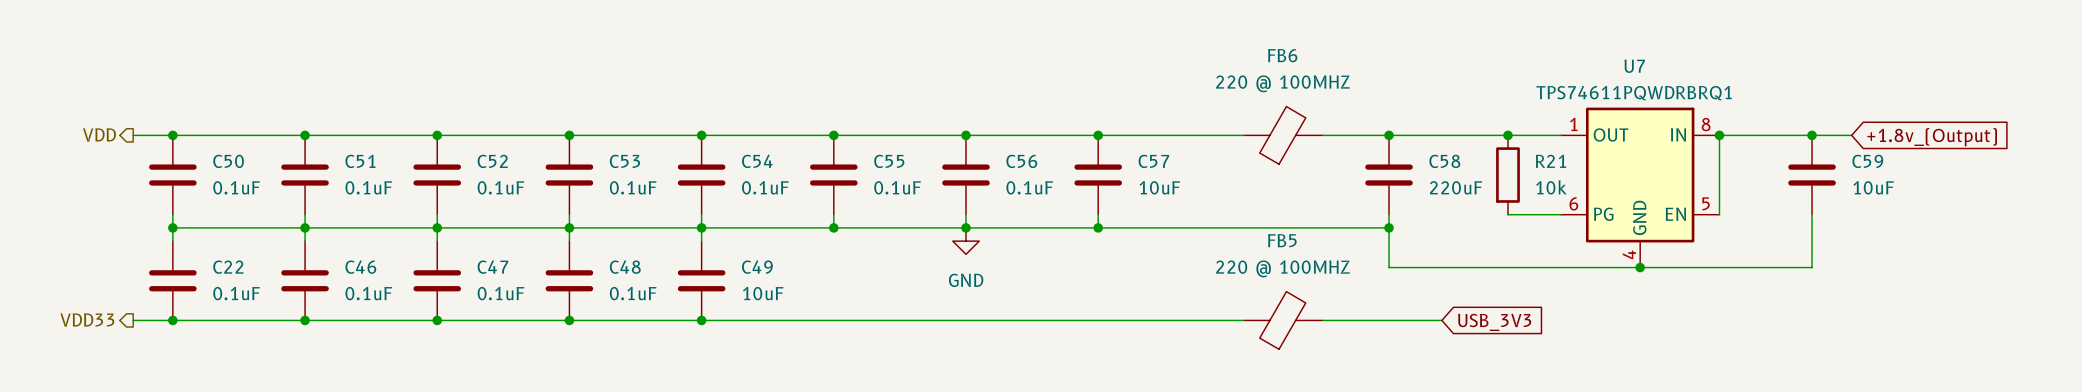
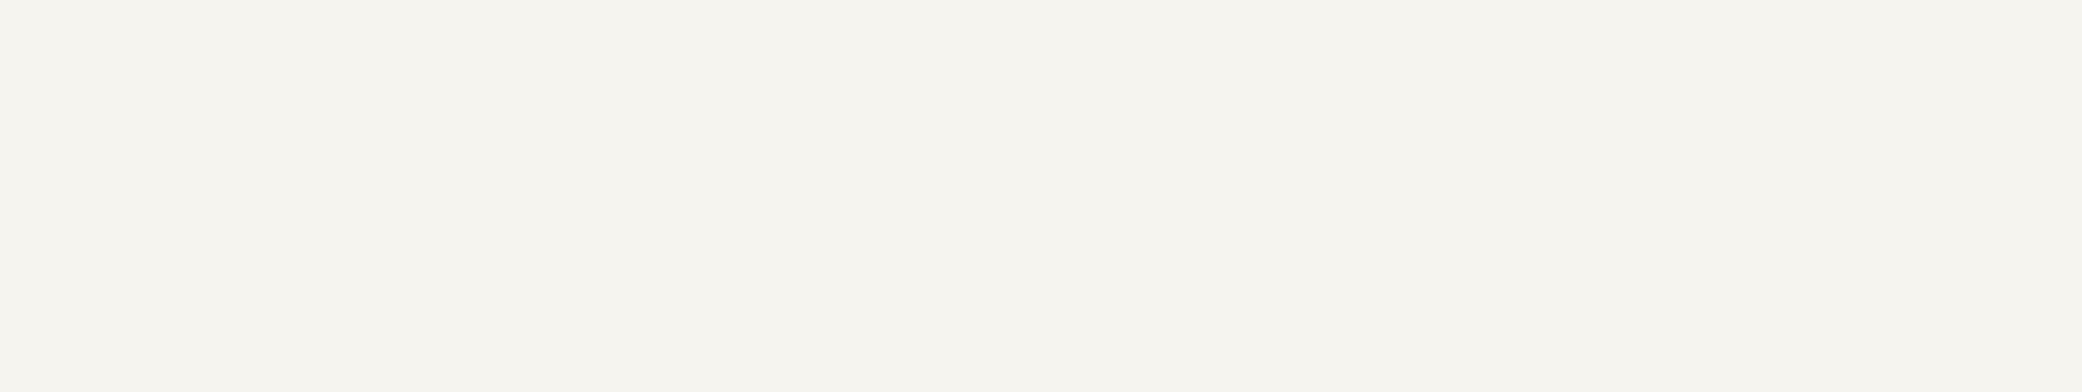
hierarchical label: VDD (99, 134) -> none
wire: (133, 135) (1243, 135) -> none
junction: (172, 135) -> none
junction: (305, 135) -> none
junction: (437, 135) -> none
junction: (569, 135) -> none
junction: (701, 135) -> none
junction: (833, 135) -> none
junction: (966, 135) -> none
junction: (1098, 135) -> none
FB6: 220 @ 100MHZ (1283, 135) -> none
wire: (1322, 135) (1560, 135) -> none
junction: (1389, 135) -> none
junction: (1507, 135) -> none
junction: (1719, 135) -> none
junction: (1812, 135) -> none
wire: (1851, 135) (1719, 135) (1719, 214) -> none
global label: +1.8v_(Output) (1932, 137) -> none
C50: 0.1uF (172, 175) -> none
C51: 0.1uF (305, 175) -> none
C52: 0.1uF (437, 175) -> none
C53: 0.1uF (569, 175) -> none
C54: 0.1uF (701, 175) -> none
C55: 0.1uF (833, 175) -> none
C56: 0.1uF (966, 175) -> none
C57: 10uF (1098, 175) -> none
C58: 220uF (1389, 175) -> none
R21: 10k (1507, 175) -> none
C59: 10uF (1812, 175) -> none
U7: TPS74611PQWDRBRQ1 (1640, 187) -> none
wire: (172, 214) (172, 241) -> none
wire: (305, 214) (305, 241) -> none
wire: (437, 214) (437, 241) -> none
wire: (569, 214) (569, 241) -> none
wire: (701, 214) (701, 241) -> none
wire: (833, 214) (833, 227) -> none
wire: (966, 214) (966, 227) -> none
wire: (1098, 214) (1098, 227) -> none
wire: (1389, 214) (1389, 267) (1812, 267) (1812, 214) -> none
wire: (1507, 214) (1560, 214) -> none
wire: (172, 227) (1389, 227) -> none
junction: (172, 227) -> none
junction: (305, 227) -> none
junction: (437, 227) -> none
junction: (569, 227) -> none
junction: (701, 227) -> none
junction: (833, 227) -> none
junction: (966, 227) -> none
junction: (1098, 227) -> none
junction: (1389, 227) -> none
power symbol: GND (966, 241) -> none
junction: (1640, 267) -> none
C22: 0.1uF (172, 280) -> none
C46: 0.1uF (305, 280) -> none
C47: 0.1uF (437, 280) -> none
C48: 0.1uF (569, 280) -> none
C49: 10uF (701, 280) -> none
hierarchical label: VDD33 (87, 320) -> none
wire: (133, 320) (1243, 320) -> none
junction: (172, 320) -> none
junction: (305, 320) -> none
junction: (437, 320) -> none
junction: (569, 320) -> none
junction: (701, 320) -> none
FB5: 220 @ 100MHZ (1283, 320) -> none
wire: (1322, 320) (1441, 320) -> none
global label: USB_3V3 (1494, 322) -> none

